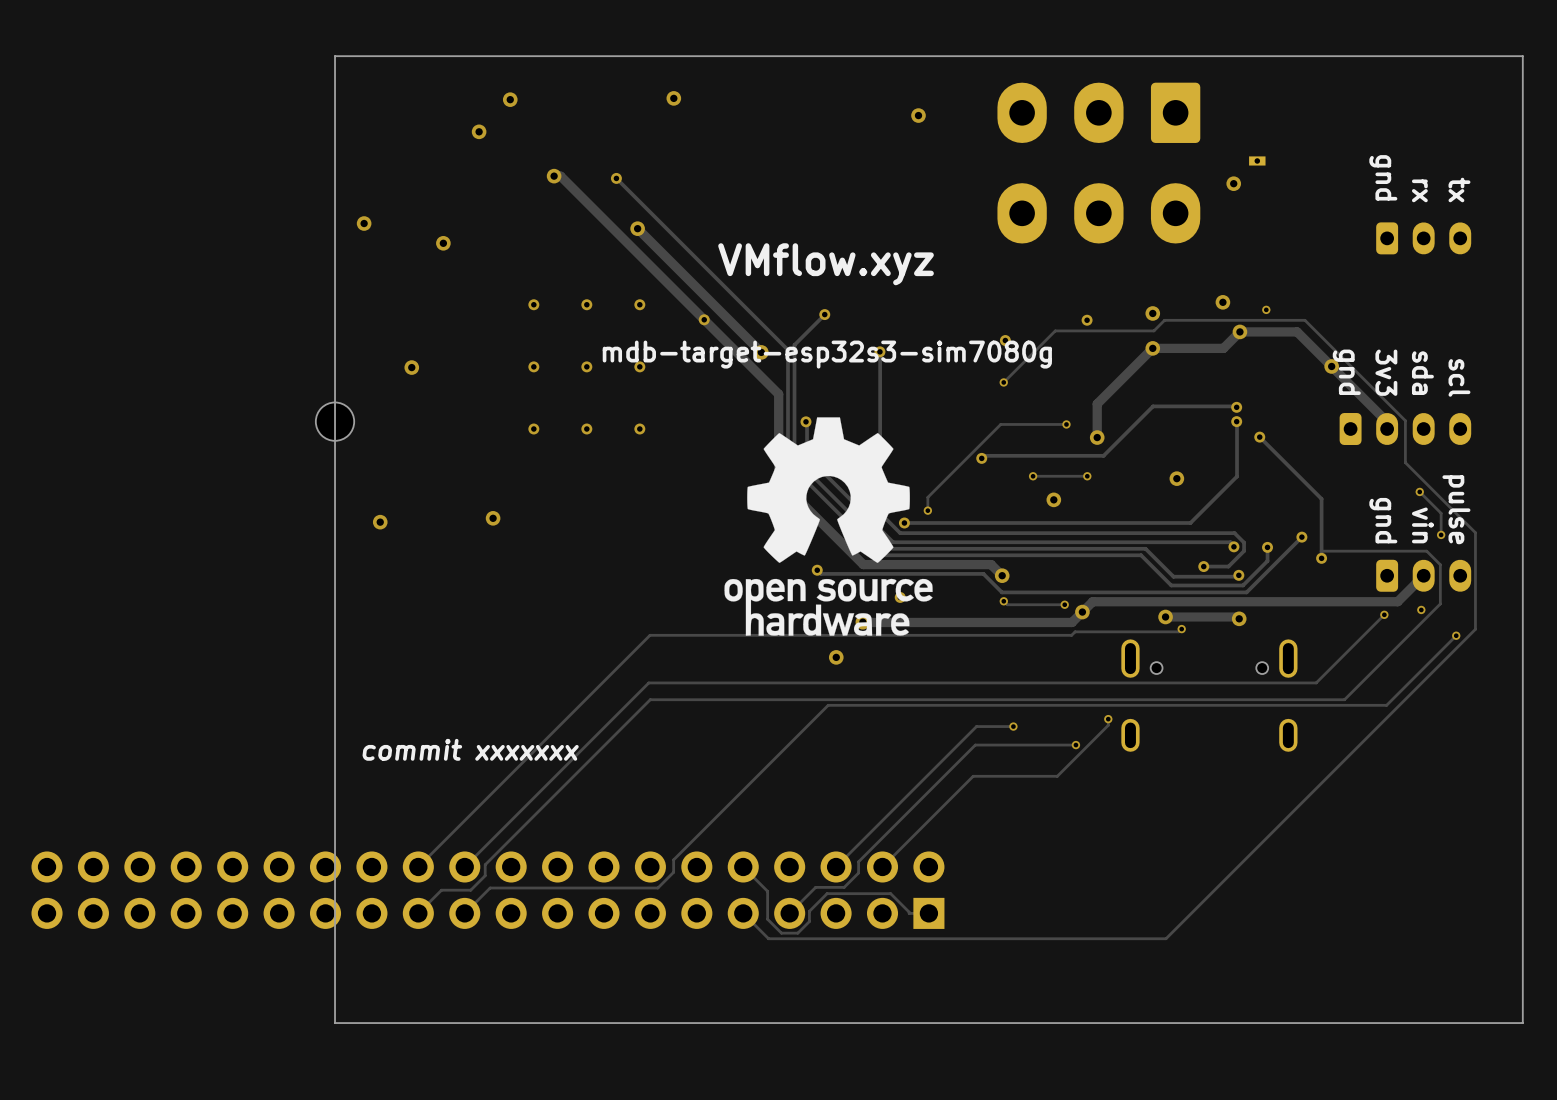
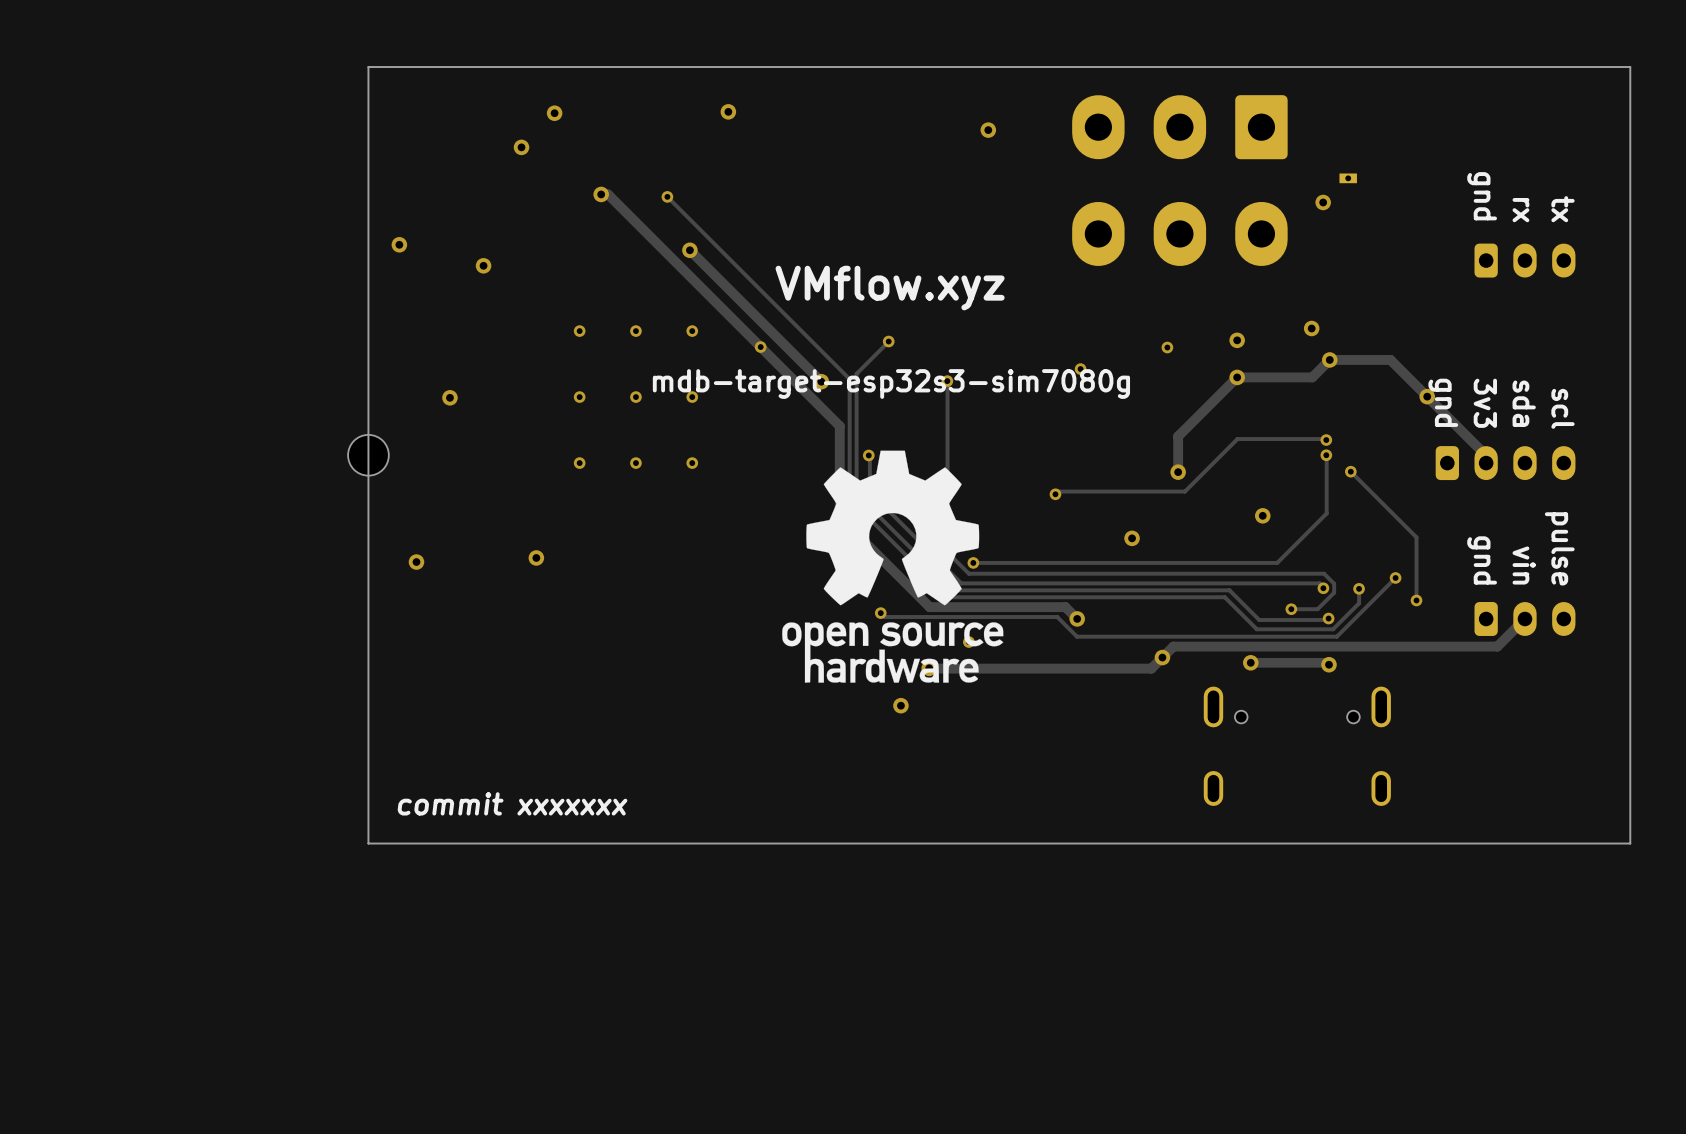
via: (1266, 309) -> none
track: (1003, 382) (1055, 330) (1153, 330) (1164, 320) (1304, 320) (1405, 420) (1405, 462) (1475, 532) (1475, 629) (1166, 938) (768, 938) (743, 913) -> none
via: (1003, 382) -> none
track: (1066, 424) (1000, 424) (927, 497) (927, 510) -> none
via: (1066, 424) -> none
via: (1033, 476) -> none
track: (1087, 476) (1033, 476) -> none
via: (1087, 476) -> none
track: (1419, 491) (1441, 513) (1441, 534) -> none
via: (1419, 491) -> none
via: (927, 510) -> none
via: (1441, 534) -> none
track: (1321, 551) (1426, 551) (1440, 564) (1440, 603) (1344, 699) (650, 699) (485, 864) (485, 875) (470, 890) (441, 890) (418, 913) -> none
track: (1003, 601) (1007, 604) (1064, 604) -> none
via: (1003, 601) -> none
via: (1064, 604) -> none
via: (1421, 609) -> none
track: (1384, 614) (1316, 682) (648, 682) (464, 866) -> none
via: (1384, 614) -> none
track: (1181, 629) (1178, 631) (1075, 631) (1071, 635) (650, 635) (418, 866) -> none
via: (1181, 629) -> none
track: (1456, 635) (1386, 705) (828, 705) (673, 859) (673, 872) (657, 888) (490, 888) (464, 913) -> none
via: (1456, 635) -> none
track: (1108, 719) (1108, 725) (1057, 776) (973, 776) (882, 866) -> none
via: (1108, 719) -> none
track: (1013, 726) (976, 726) (836, 866) -> none
via: (1013, 726) -> none
track: (1075, 745) (975, 745) (858, 861) (858, 873) (844, 887) (815, 887) (789, 913) -> none
via: (1075, 745) -> none
board edge: (1522, 787) (1522, 1023) (335, 1023) (335, 787) -> (1630, 843) (368, 843)
track: (743, 866) (767, 891) (767, 919) (781, 933) (797, 933) (809, 921) (809, 911) (827, 893) (890, 893) (909, 913) (928, 913) -> none
part: (487, 890) -> none

